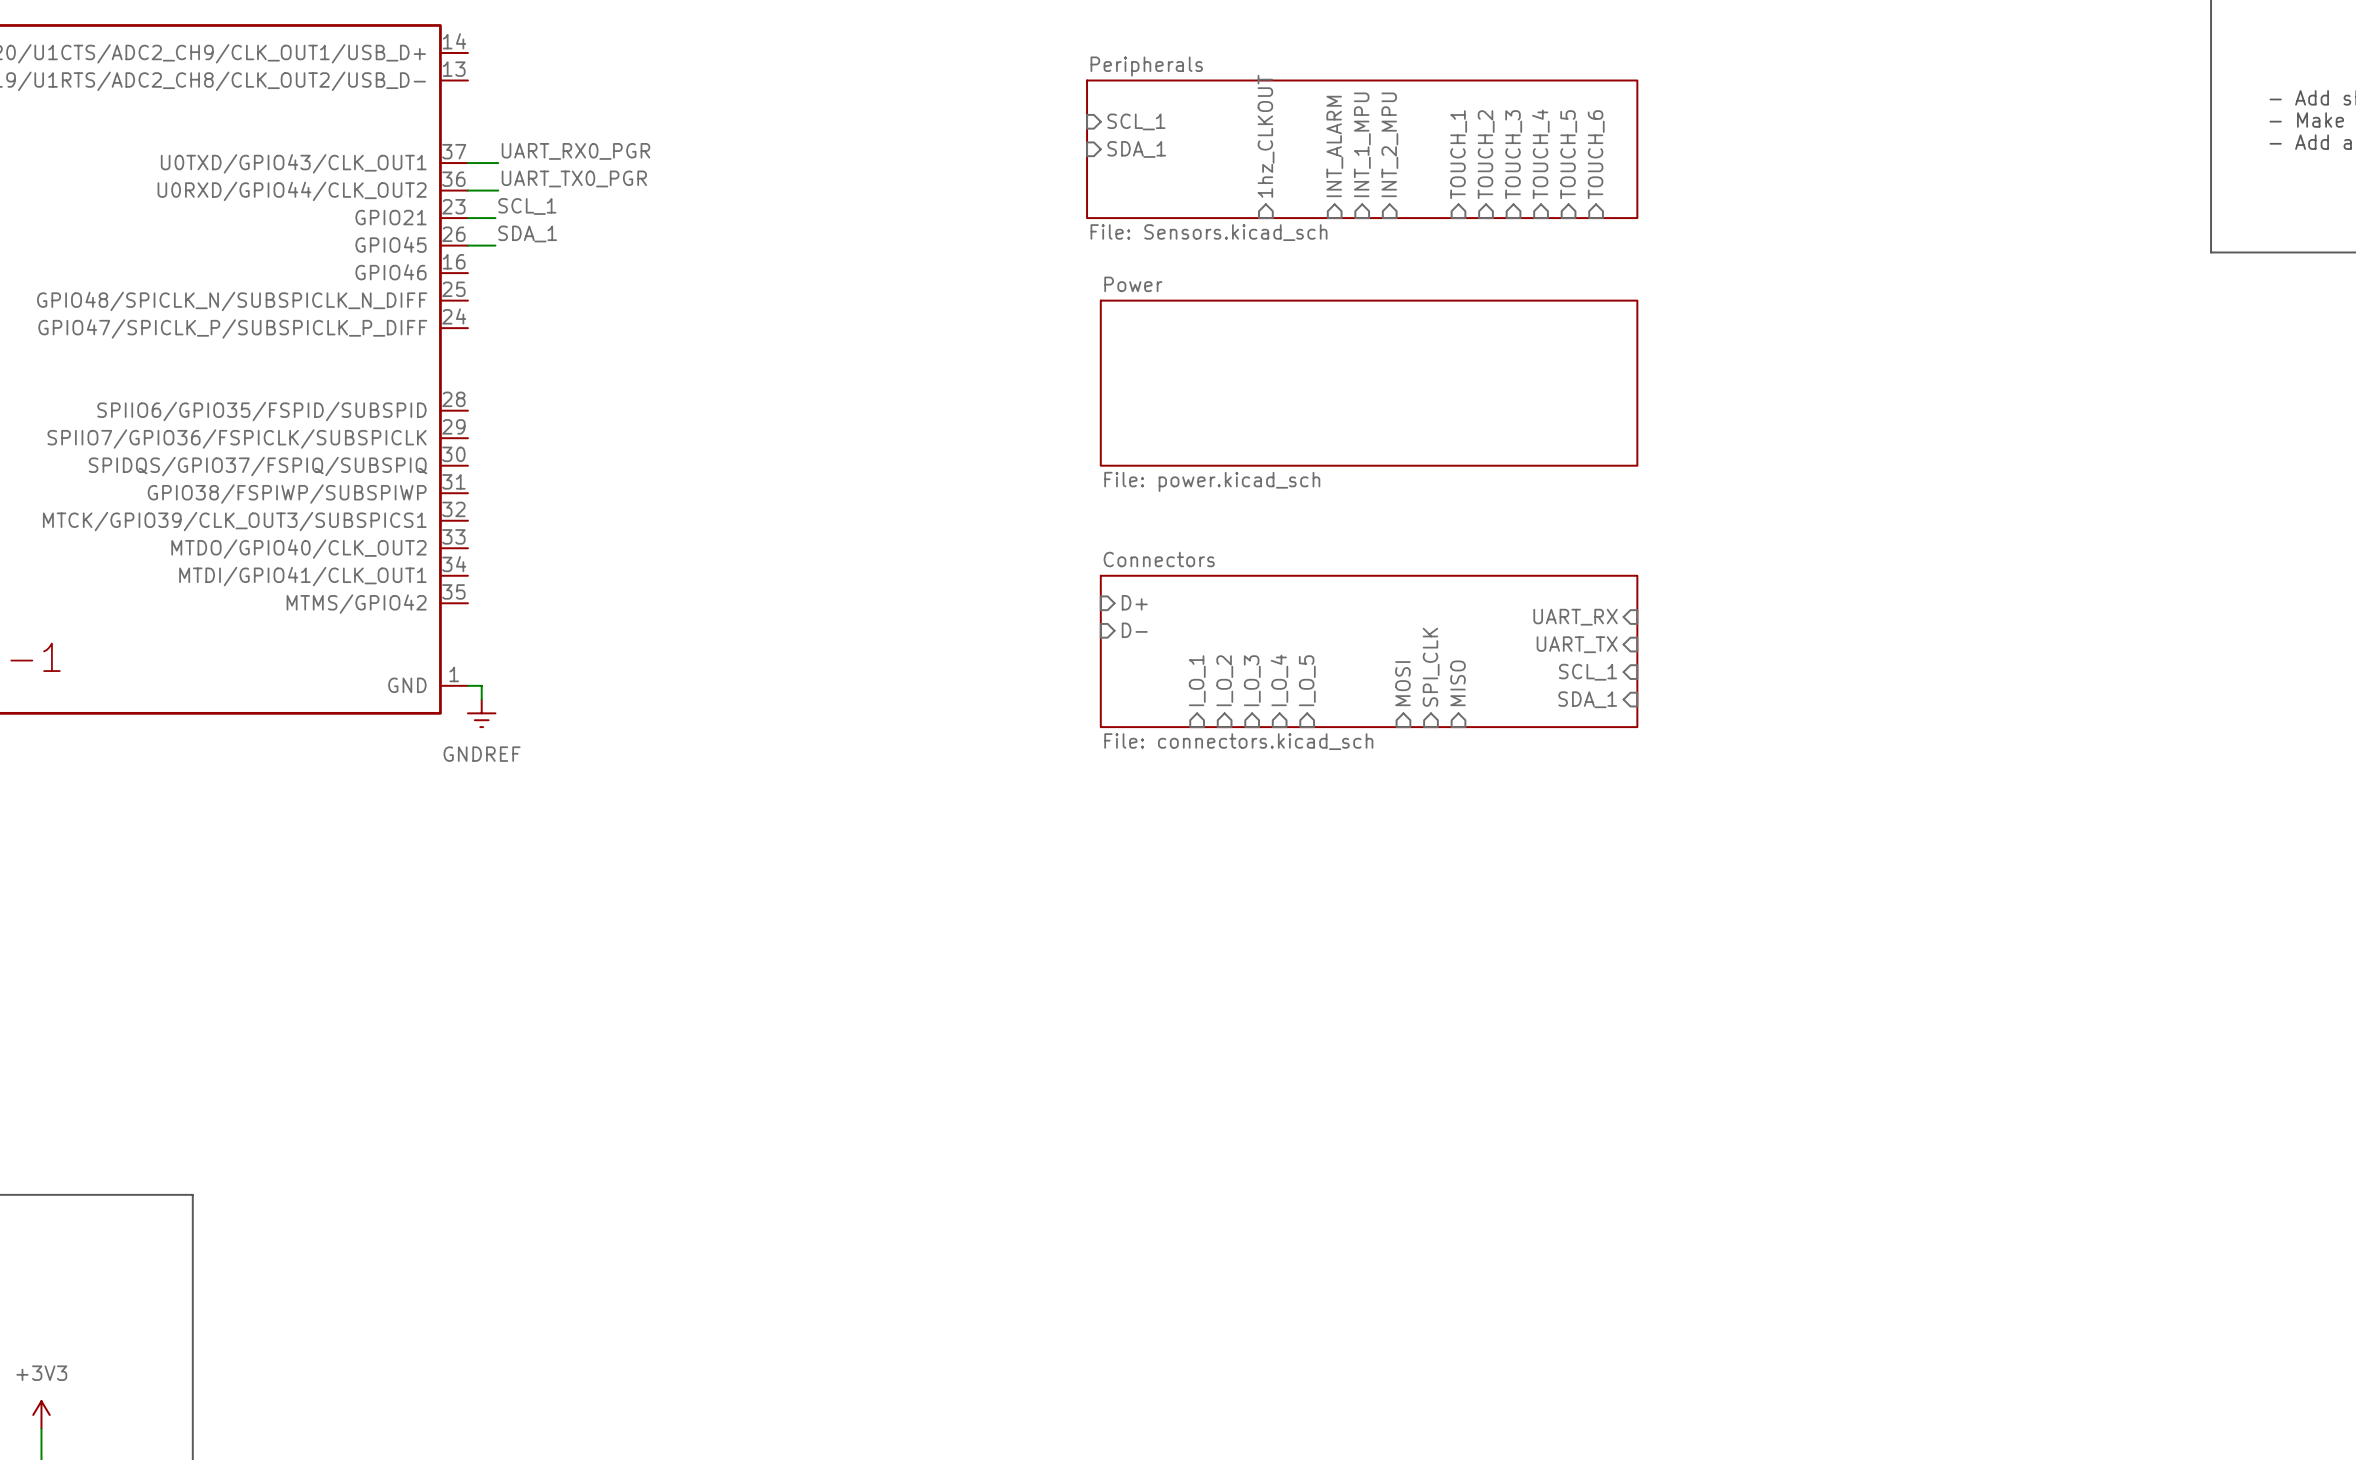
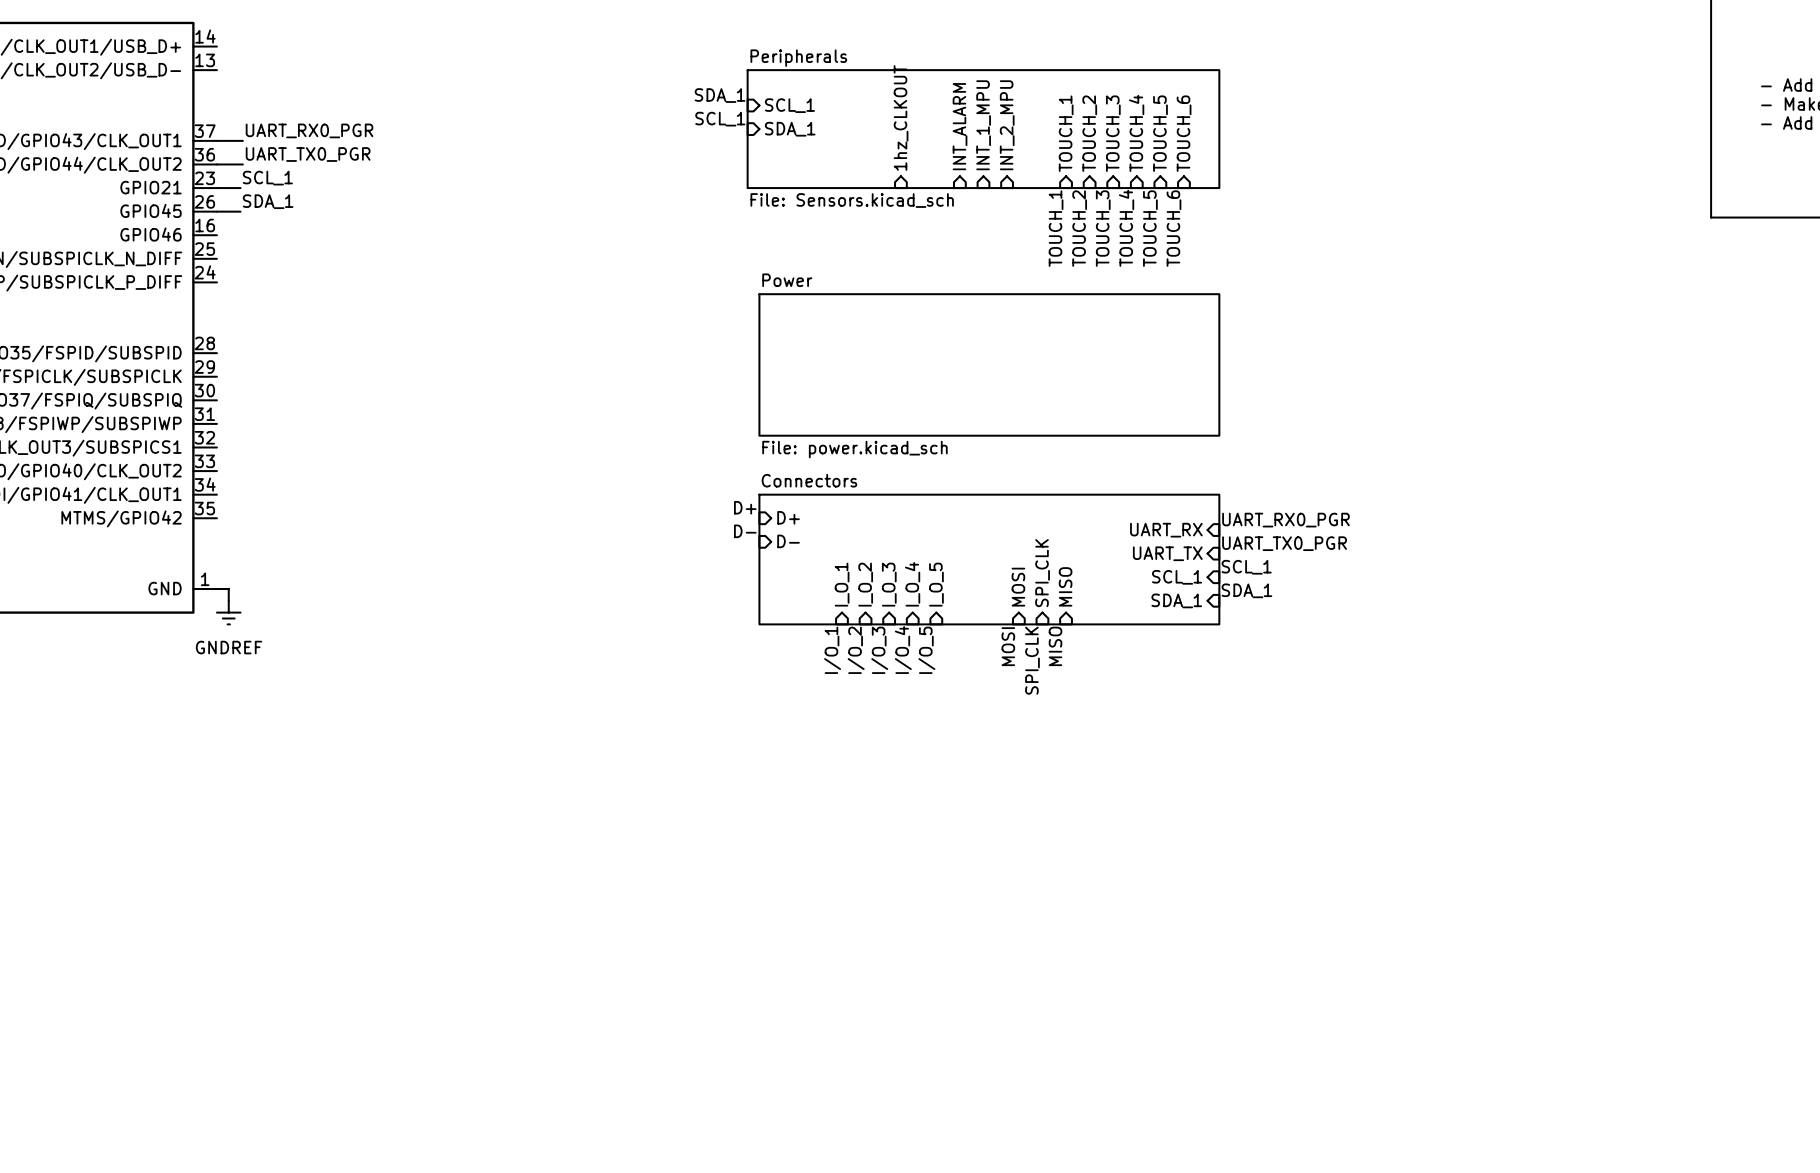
label: none -> SDA_1 (720, 95)
label: none -> SCL_1 (720, 119)
label: none -> TOUCH_1 (1056, 228)
label: none -> TOUCH_2 (1079, 228)
label: none -> TOUCH_3 (1103, 228)
label: none -> TOUCH_4 (1126, 228)
label: none -> TOUCH_5 (1150, 228)
label: none -> TOUCH_6 (1174, 228)
sheet Power position: (1369, 383) -> (989, 364)
label: none -> D+ (745, 507)
label: none -> UART_RX0_PGR (1285, 520)
label: none -> D- (745, 531)
label: none -> UART_TX0_PGR (1284, 543)
label: none -> SCL_1 (1246, 567)
label: none -> SDA_1 (1246, 590)
sheet Connectors value: File: connectors.kicad_sch (1238, 741) -> none
label: none -> MISO (1055, 646)
label: none -> MOSI (1008, 646)
label: none -> I/O_1 (832, 650)
label: none -> I/O_2 (856, 650)
label: none -> I/O_3 (879, 650)
label: none -> I/O_4 (903, 650)
label: none -> I/O_5 (926, 650)
label: none -> SPI_CLK (1032, 660)

